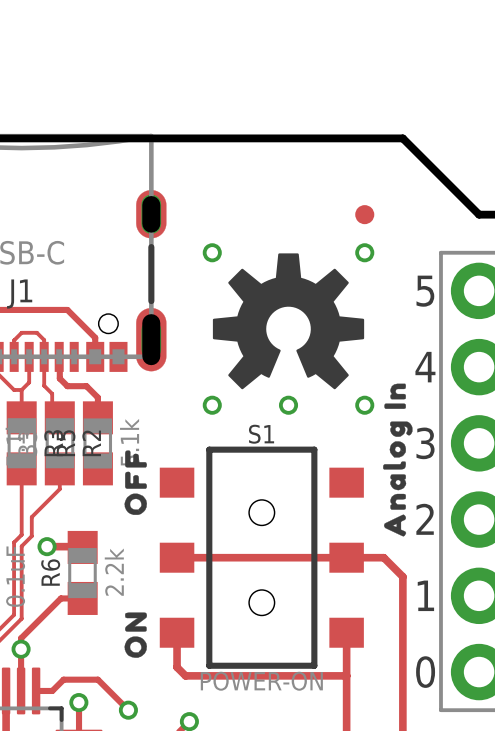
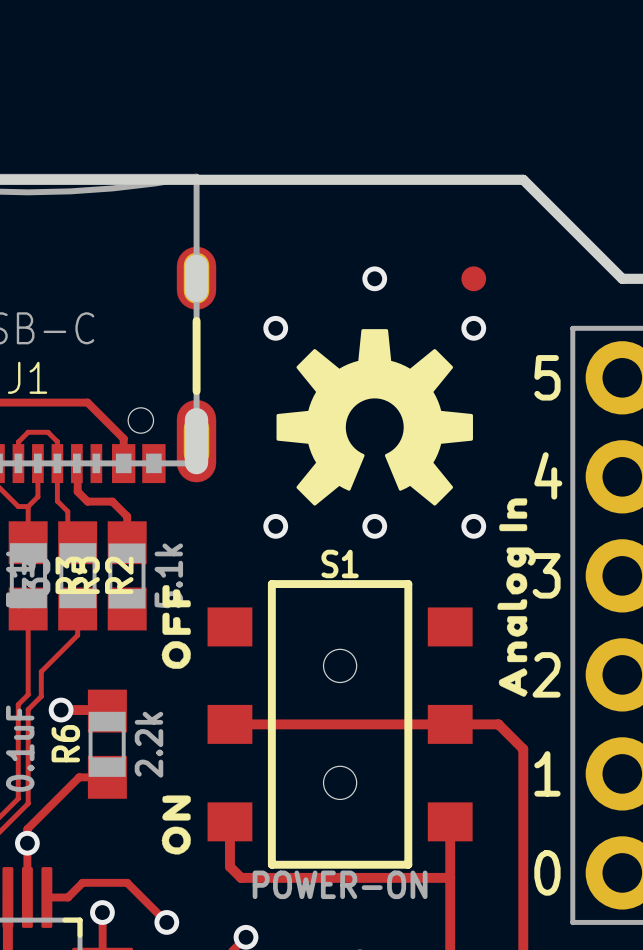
via: none -> (374, 278)

